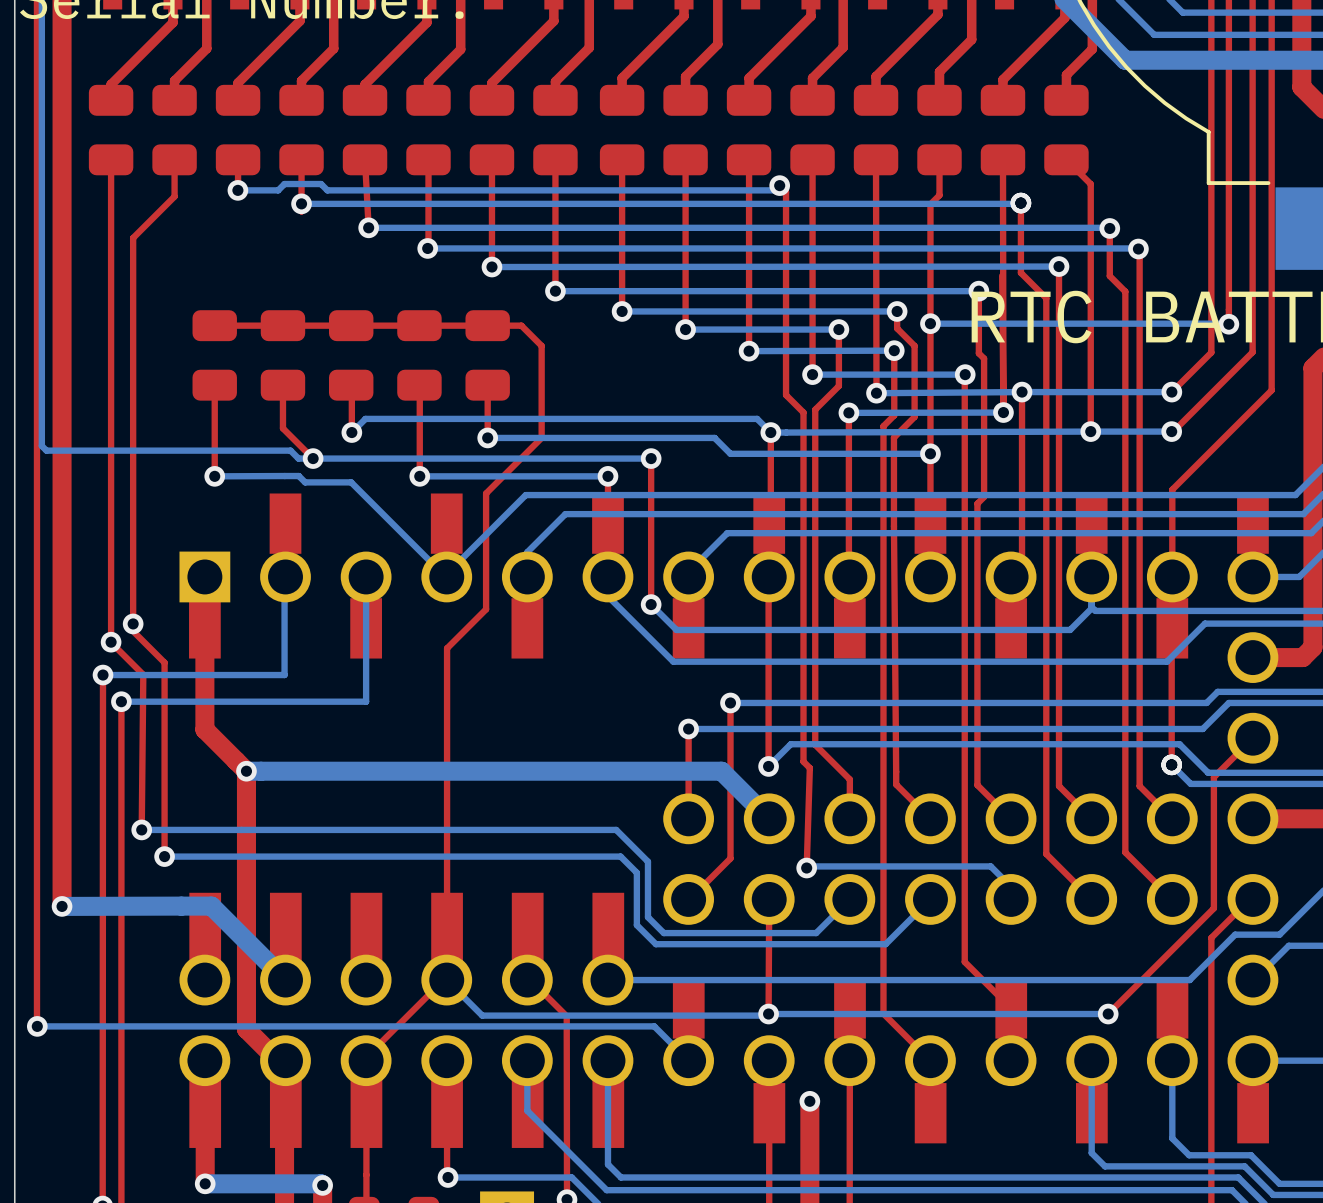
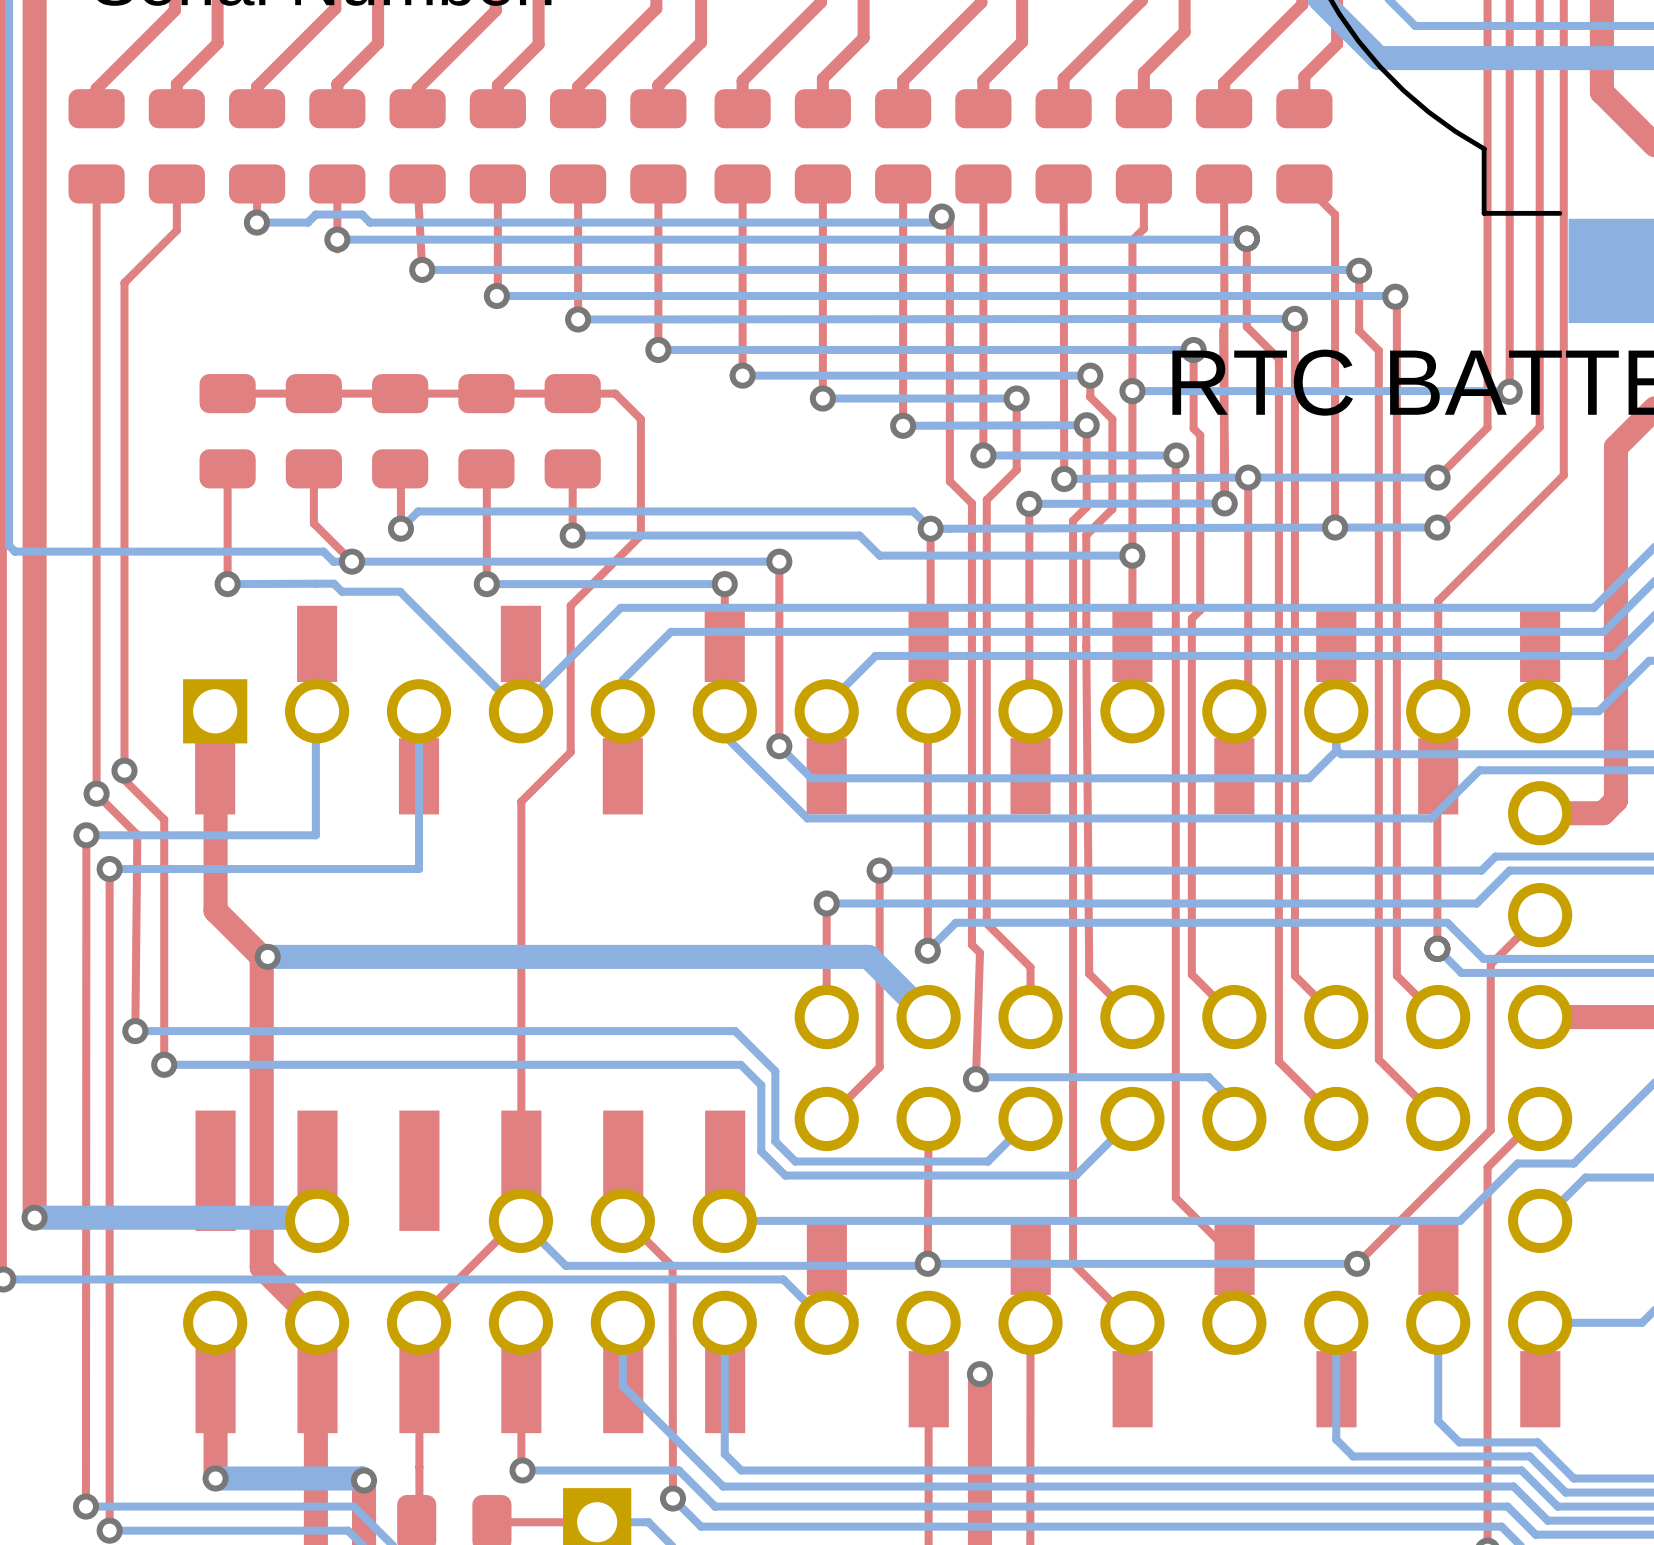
part footprint: [179, 493, 1279, 1148] -> [183, 605, 1573, 1434]
top track: none -> (215, 711) (215, 910) (261, 956) (261, 1267) (315, 1321)
top track: (204, 628) (204, 729) (246, 771) (246, 1029) (285, 1068) (285, 1100) -> none
top track: none -> (34, 1127) (34, 1217)
bottom track: (62, 906) (211, 906) (282, 977) -> (34, 1217) (313, 1217)
via position: (62, 906) -> (34, 1217)

